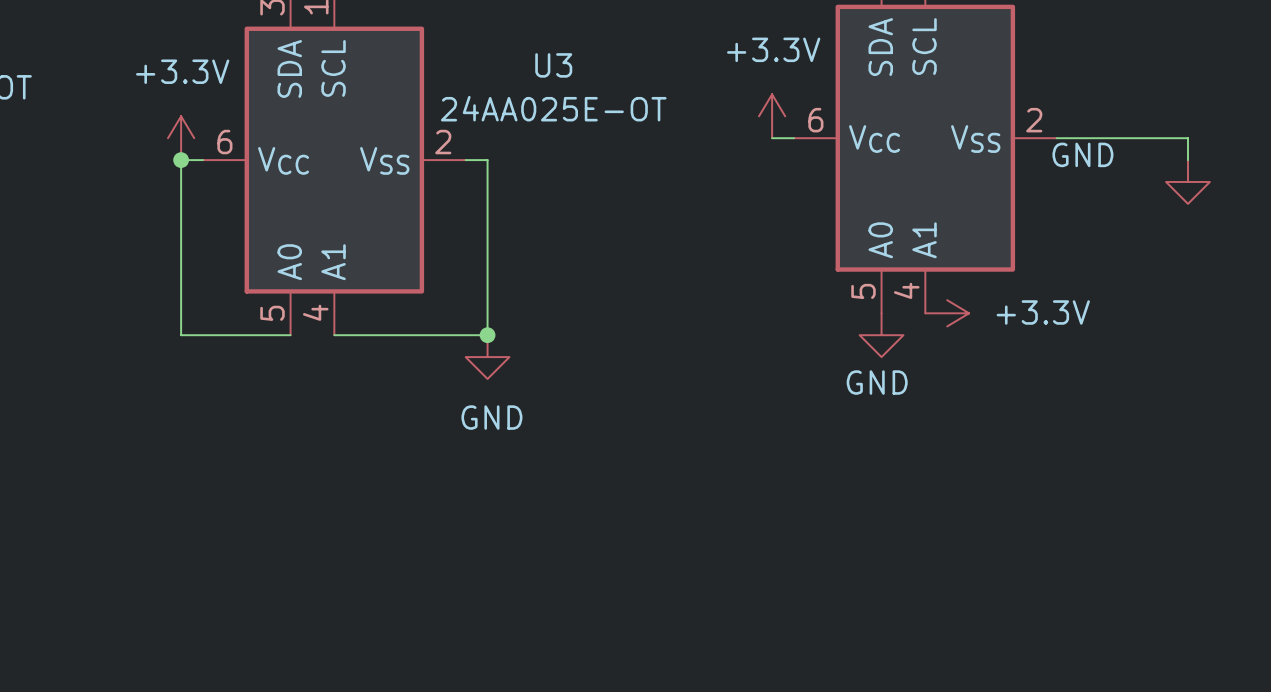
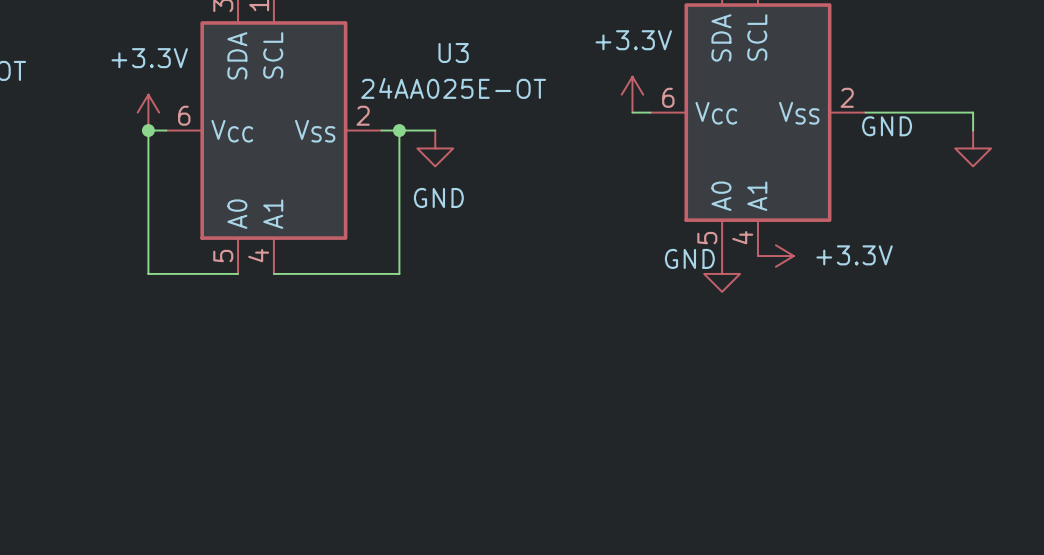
wire: none -> (399, 130) (435, 130)
junction: none -> (399, 130)
junction: (487, 335) -> none
power symbol position: GND (487, 357) -> GND (435, 148)
power symbol text position: GND (877, 382) -> GND (689, 258)

